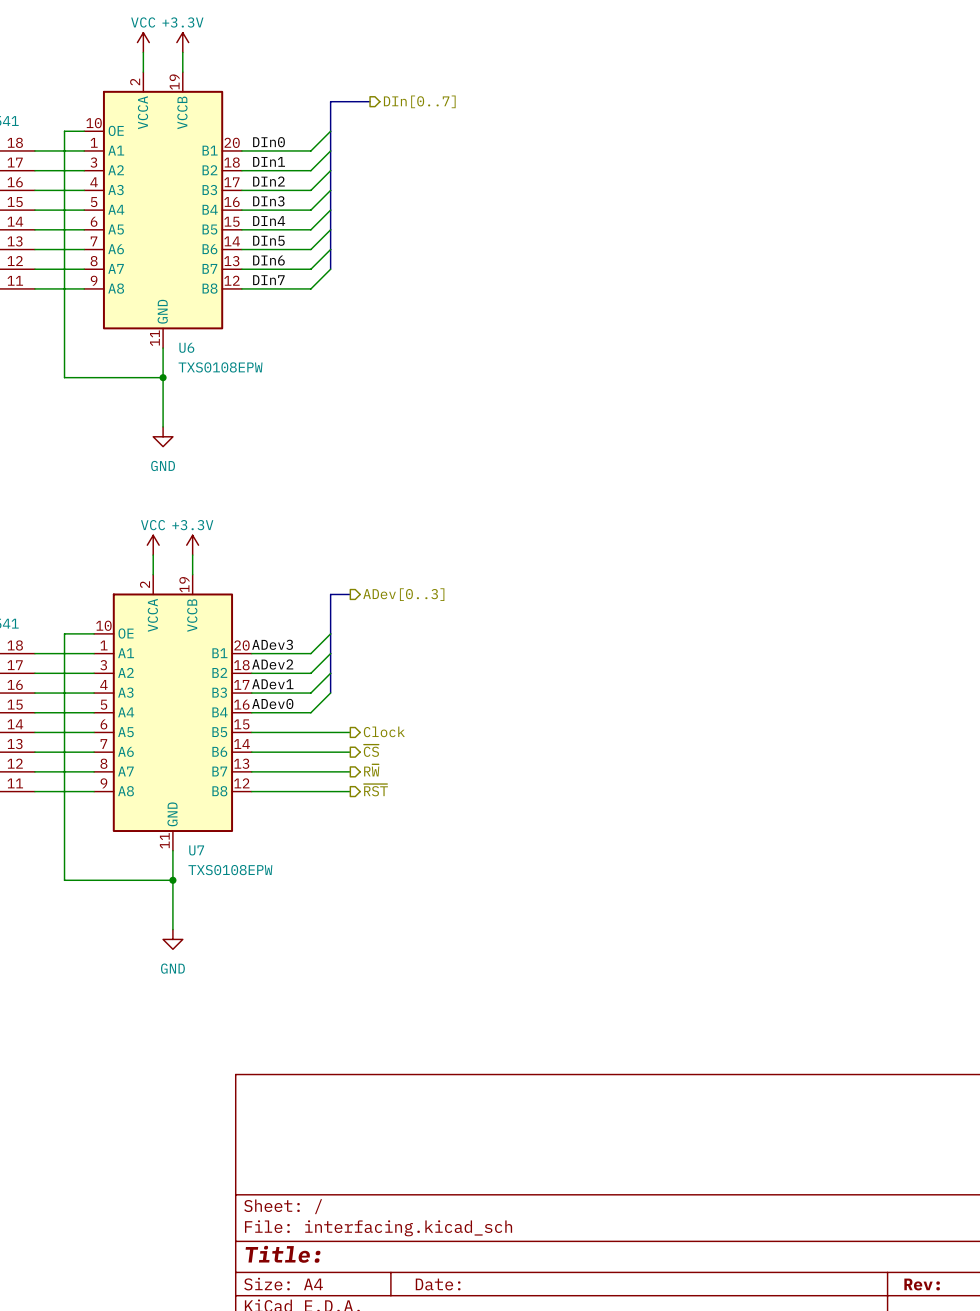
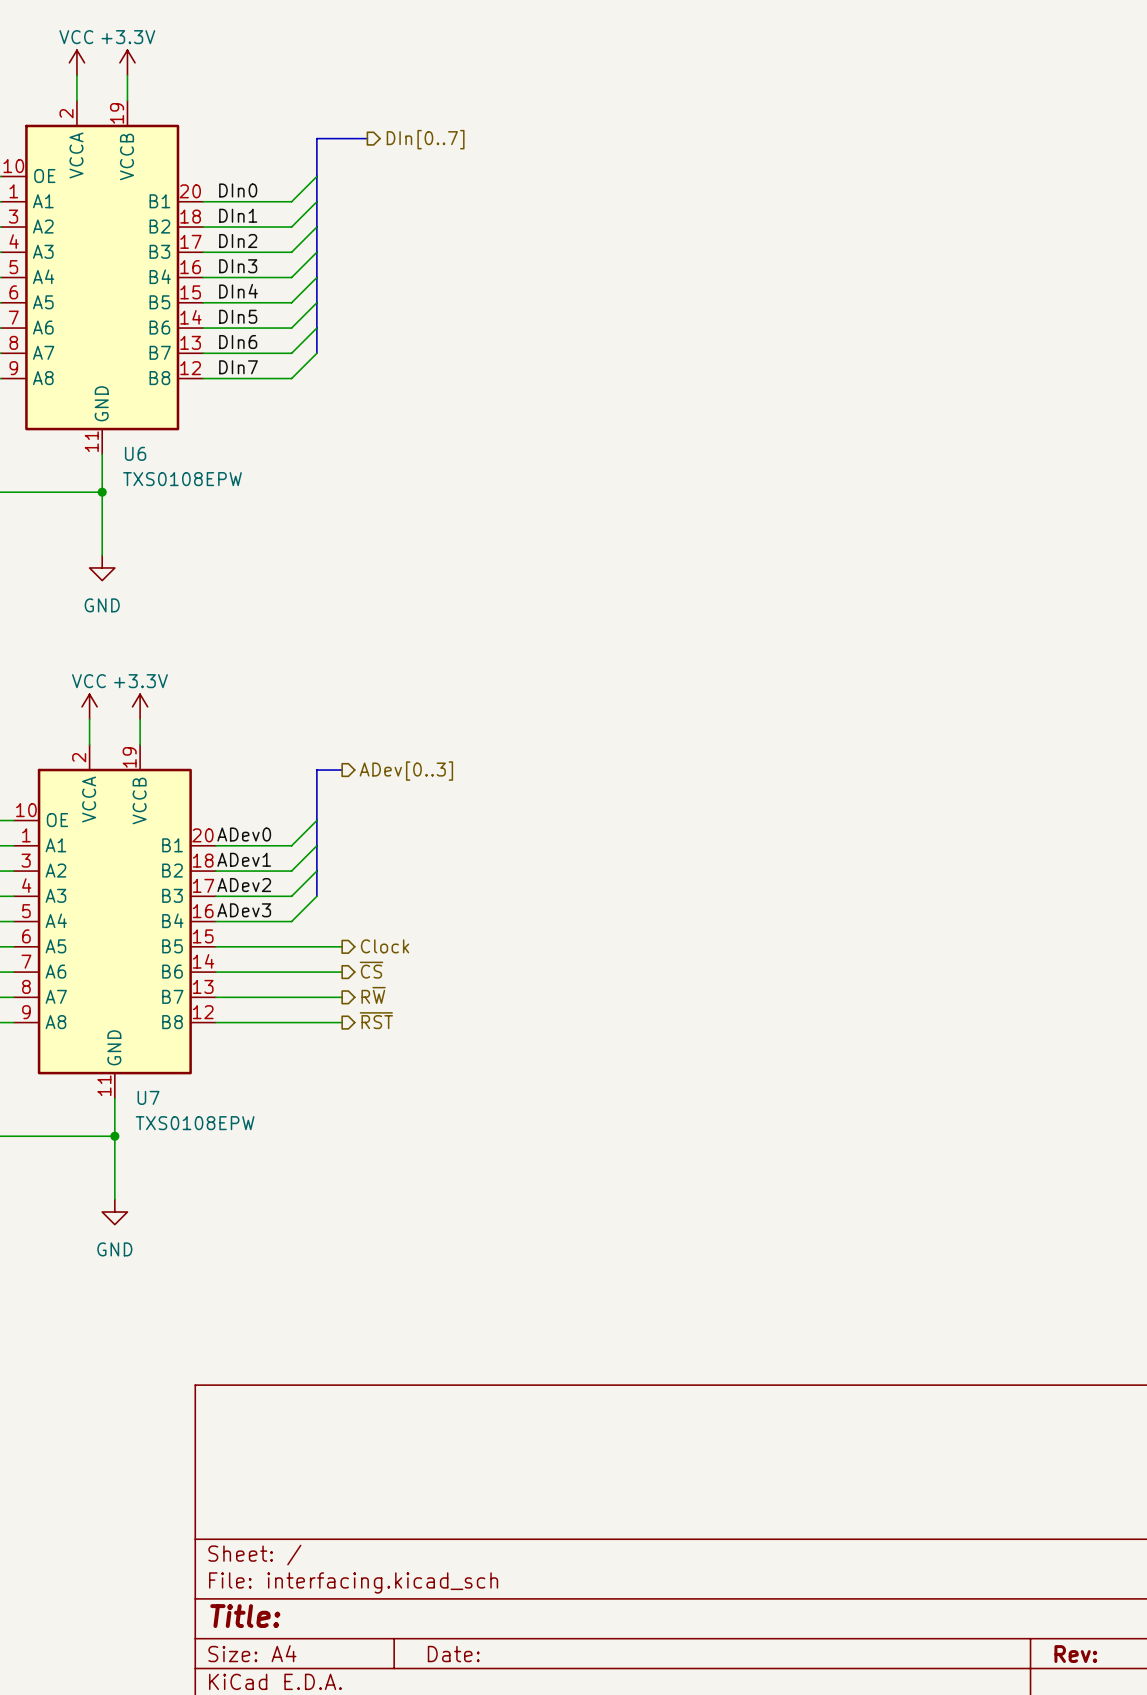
label: ADev3 (272, 644) -> ADev0 (244, 834)
label: ADev2 (272, 664) -> ADev1 (244, 859)
label: ADev1 (272, 684) -> ADev2 (244, 885)
label: ADev0 (272, 703) -> ADev3 (244, 910)

